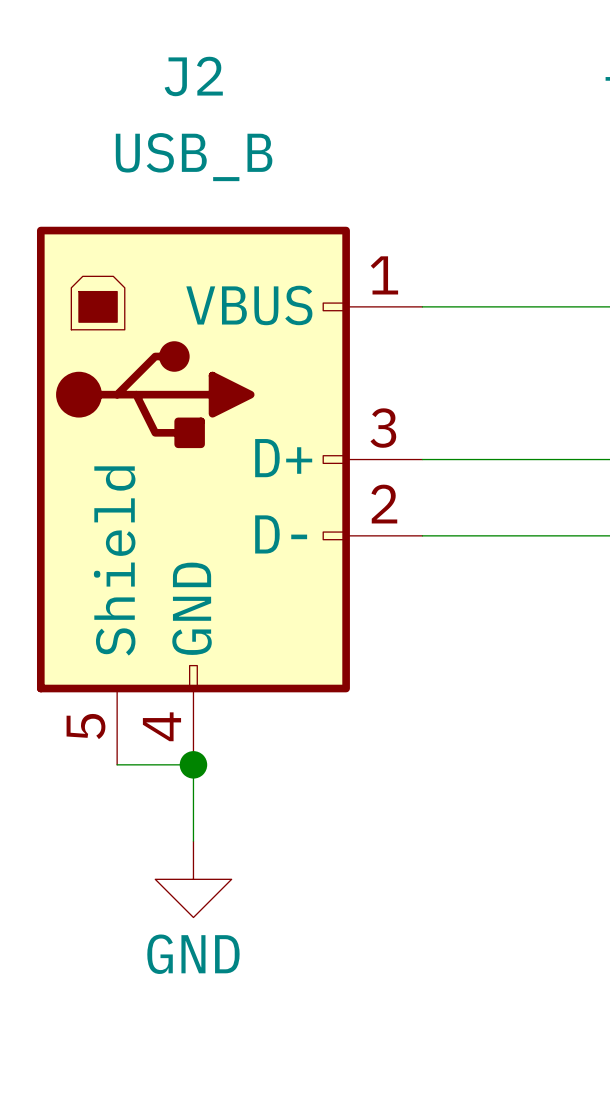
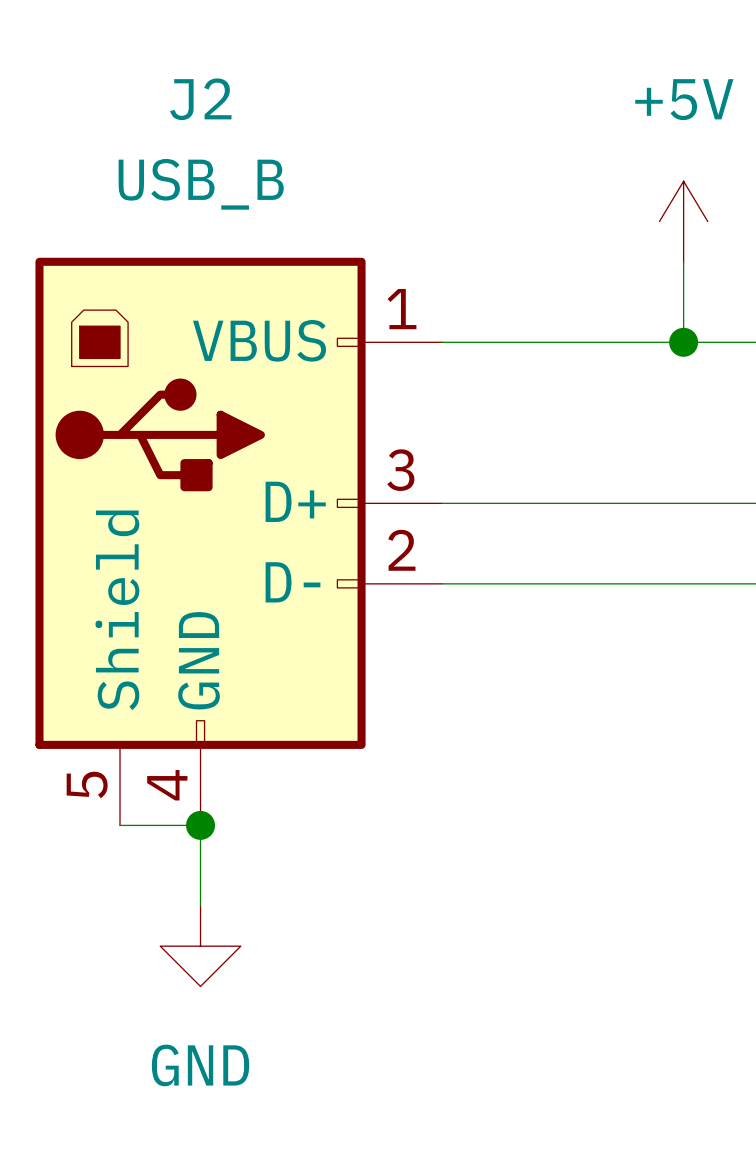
power symbol text position: GND (193, 954) -> GND (200, 1065)

